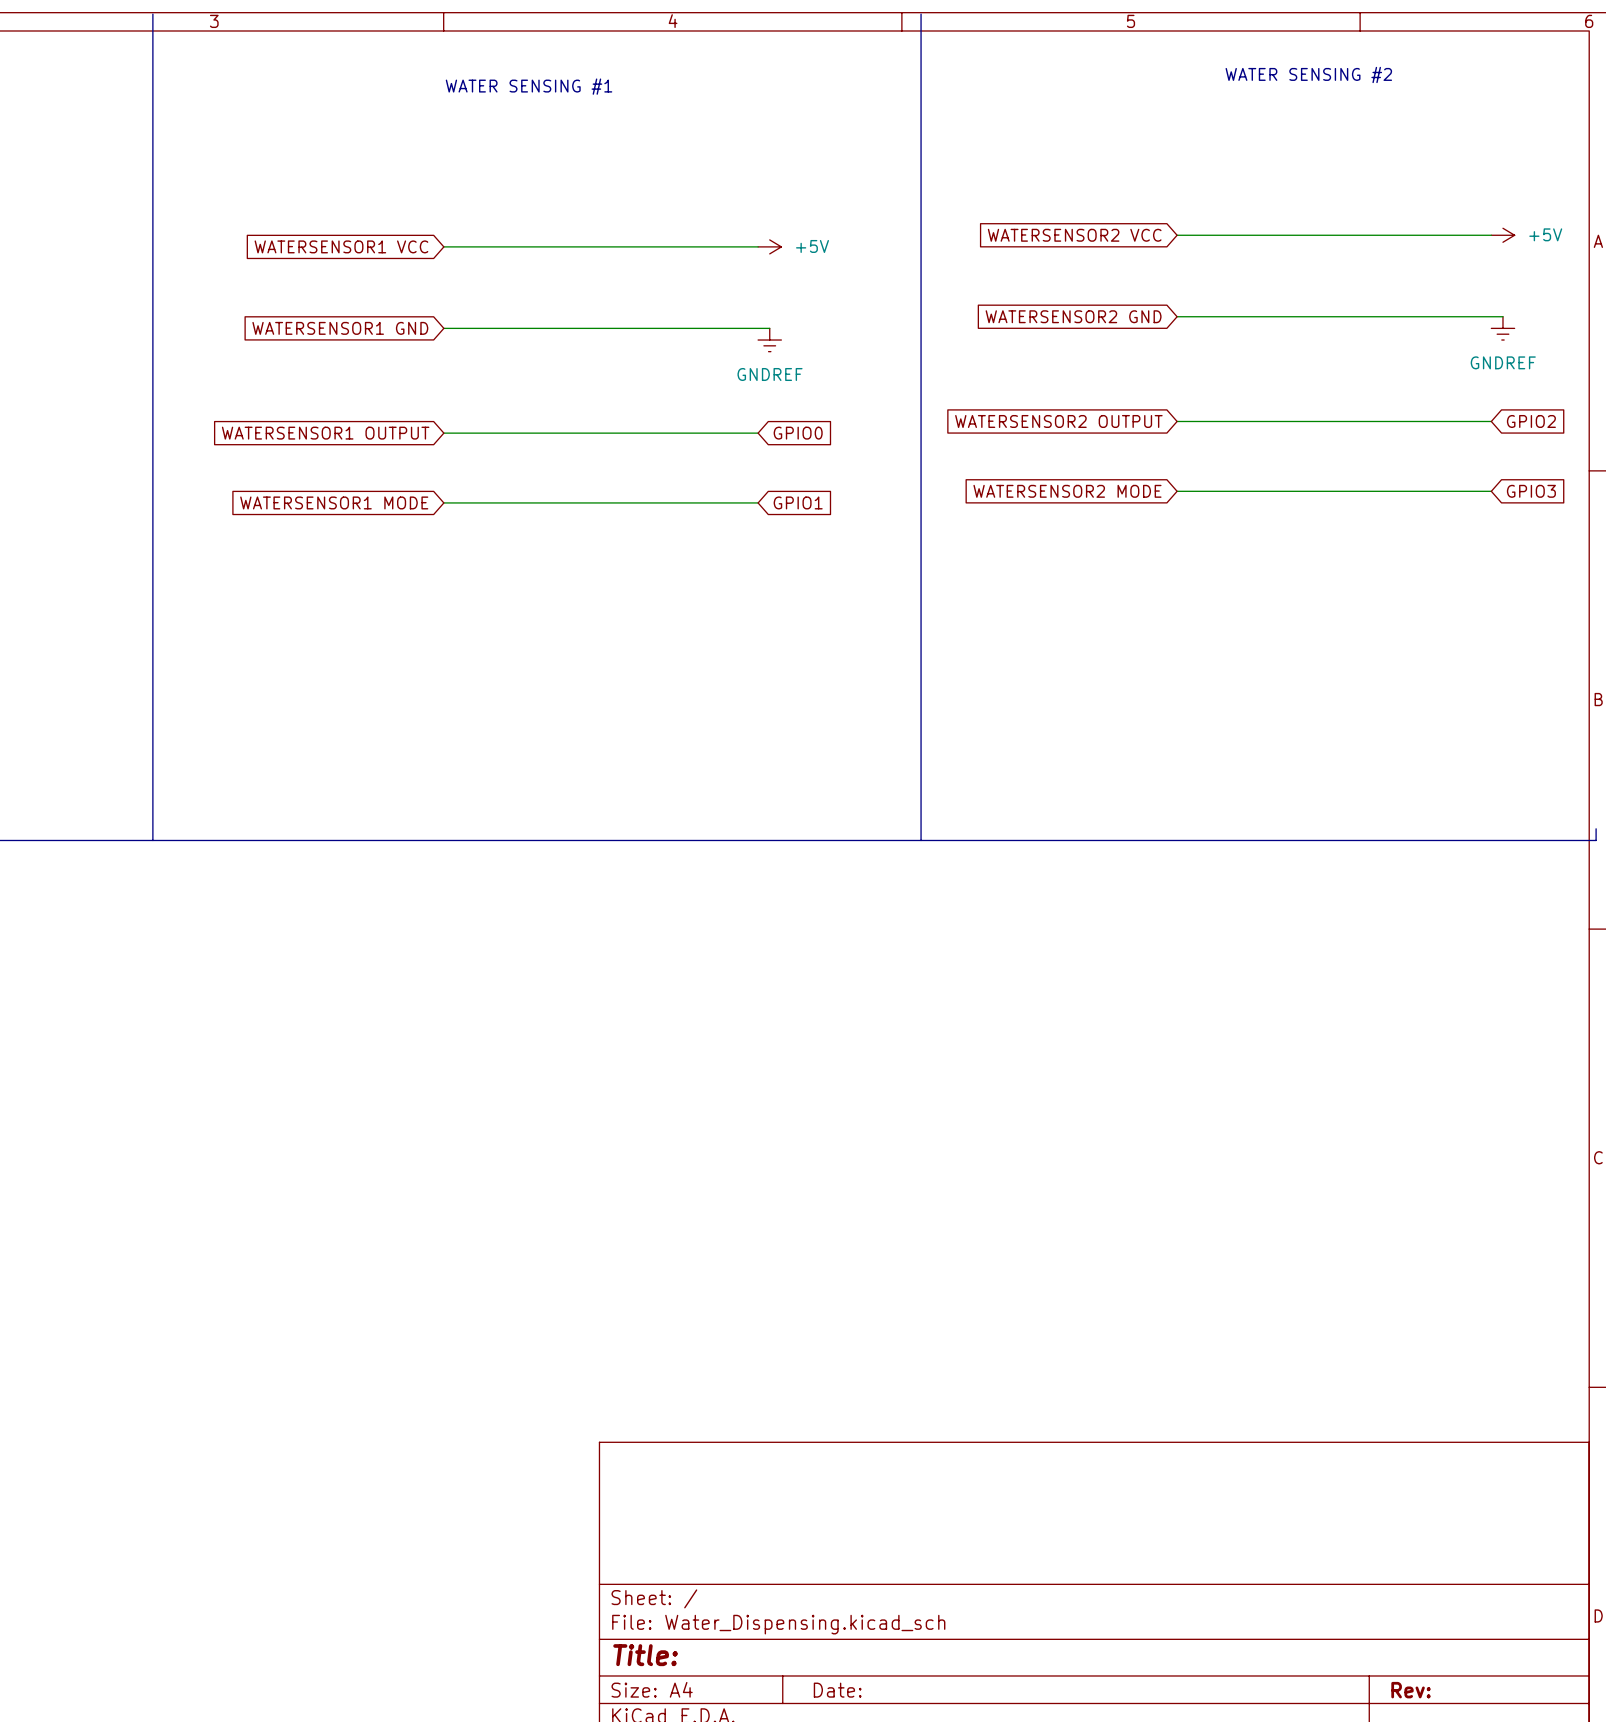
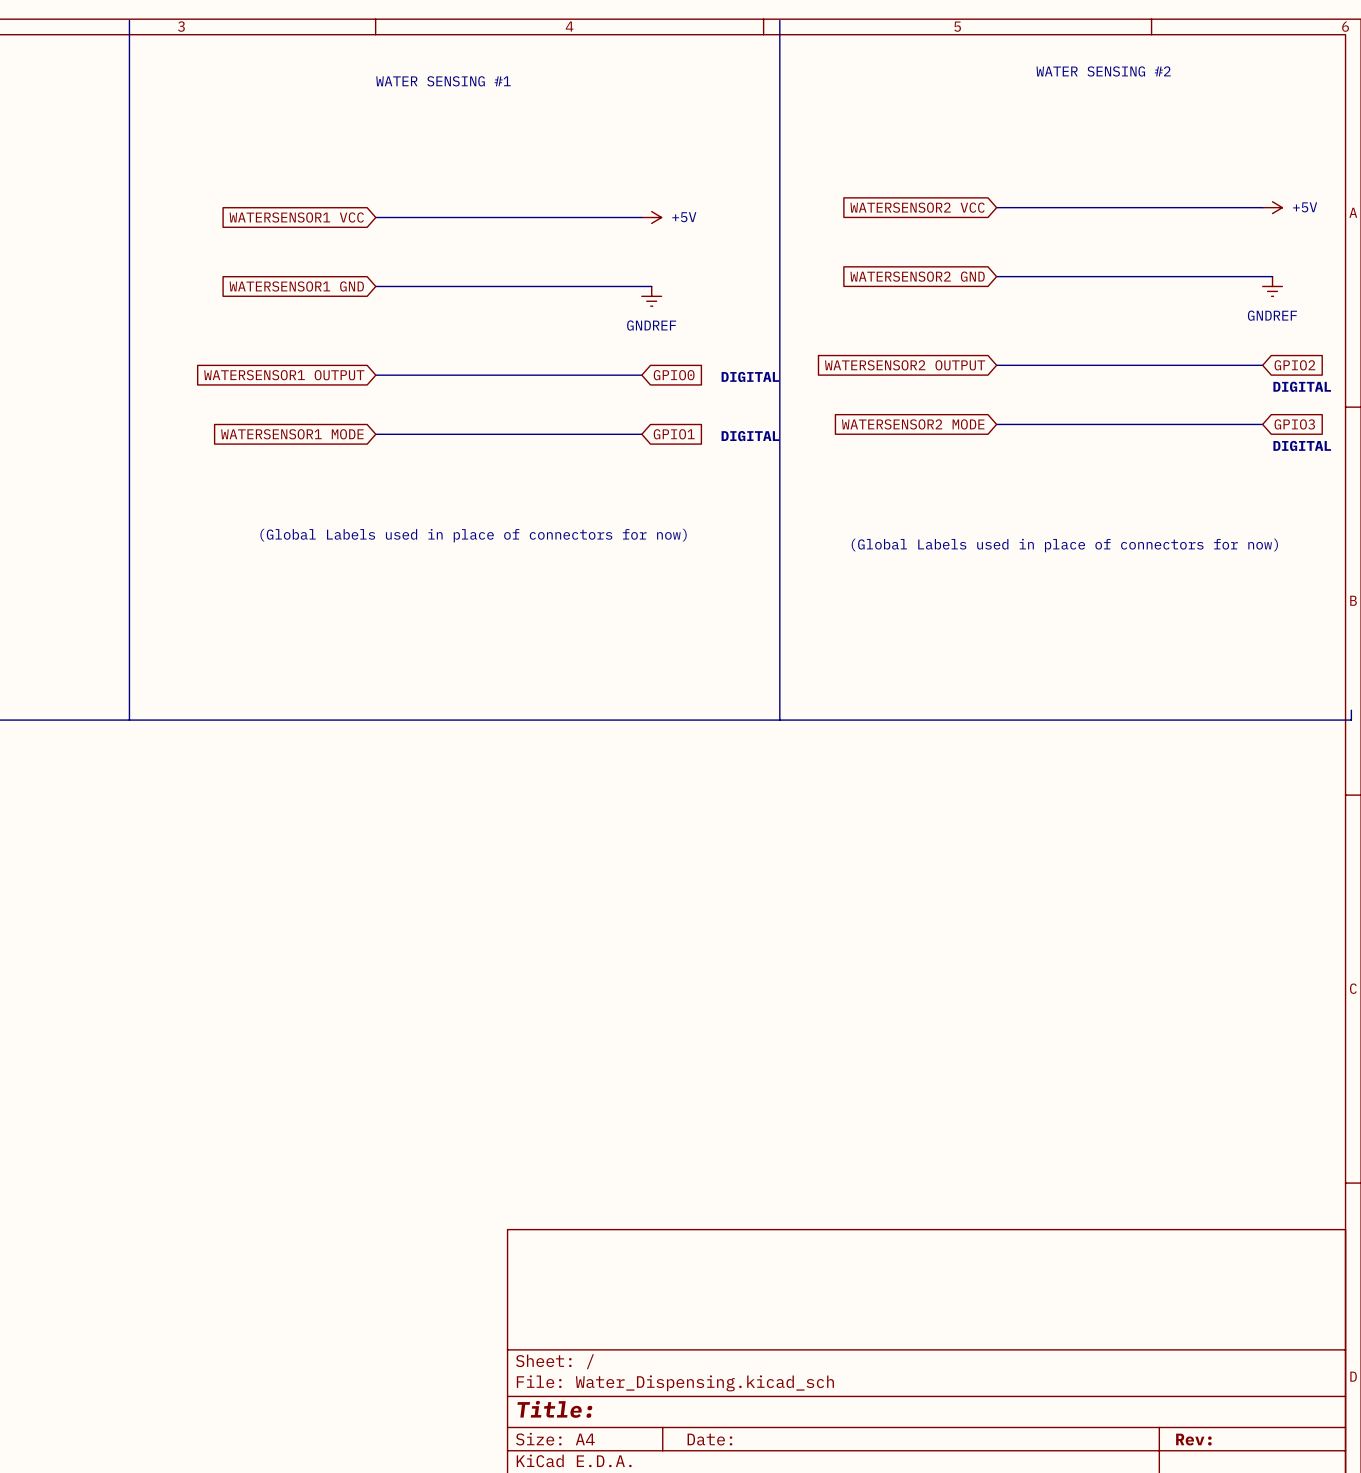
text: none -> DIGITAL (750, 376)
text: none -> DIGITAL (1302, 386)
text: none -> DIGITAL (750, 436)
text: none -> DIGITAL (1302, 445)
text: none -> (Global Labels used in place of connectors for now) (473, 535)
text: none -> (Global Labels used in place of connectors for now) (1064, 545)

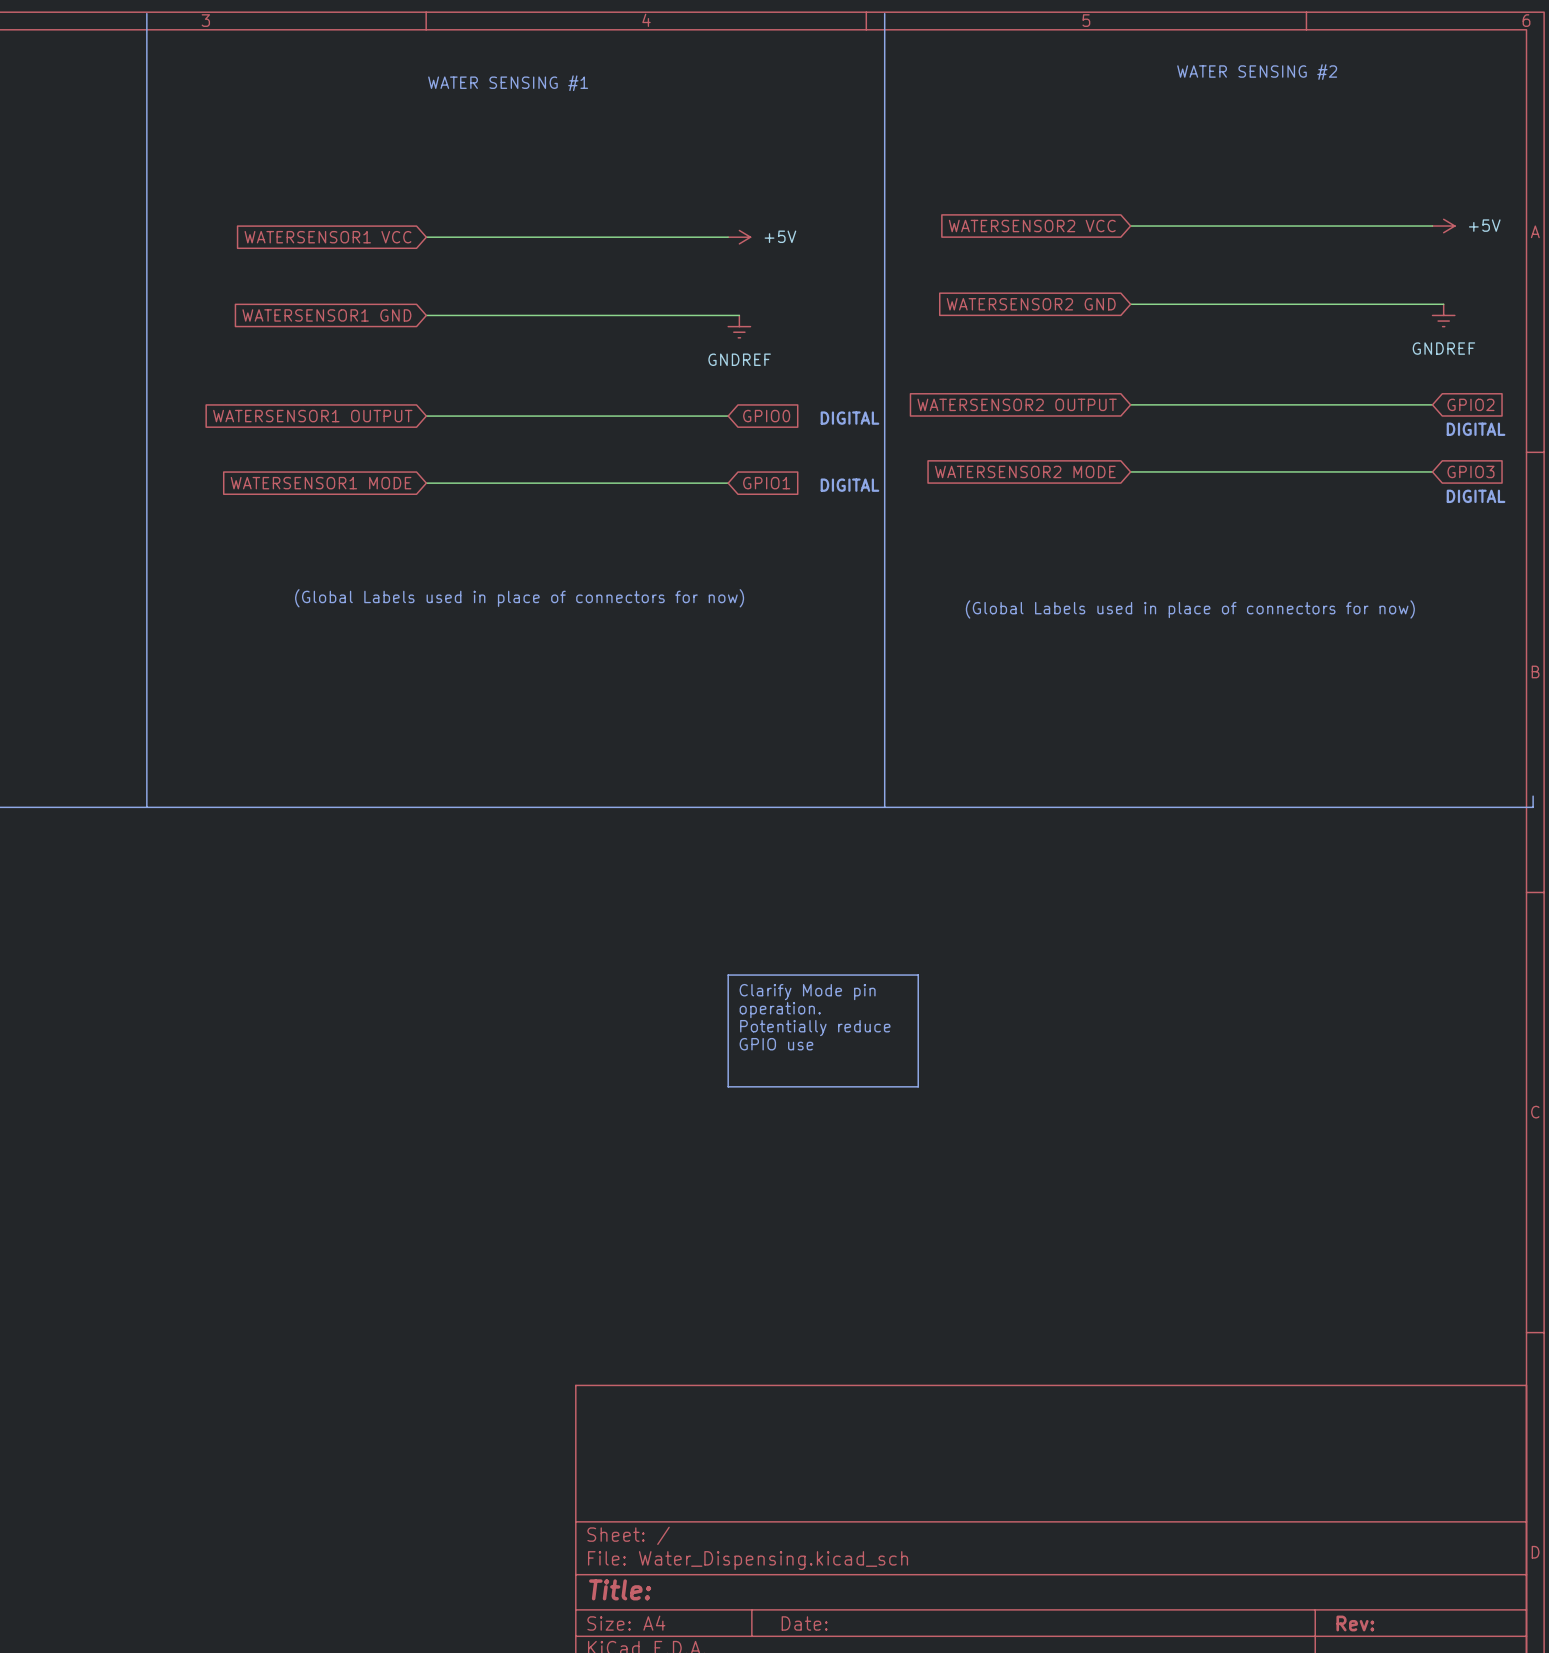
line: none -> (728, 975) (918, 975) (918, 1086) (728, 1086) (728, 975)
text: none -> Clarify Mode pin (807, 992)
text: none -> operation. (780, 1010)
text: none -> Potentially reduce (815, 1028)
text: none -> GPIO use (776, 1044)

